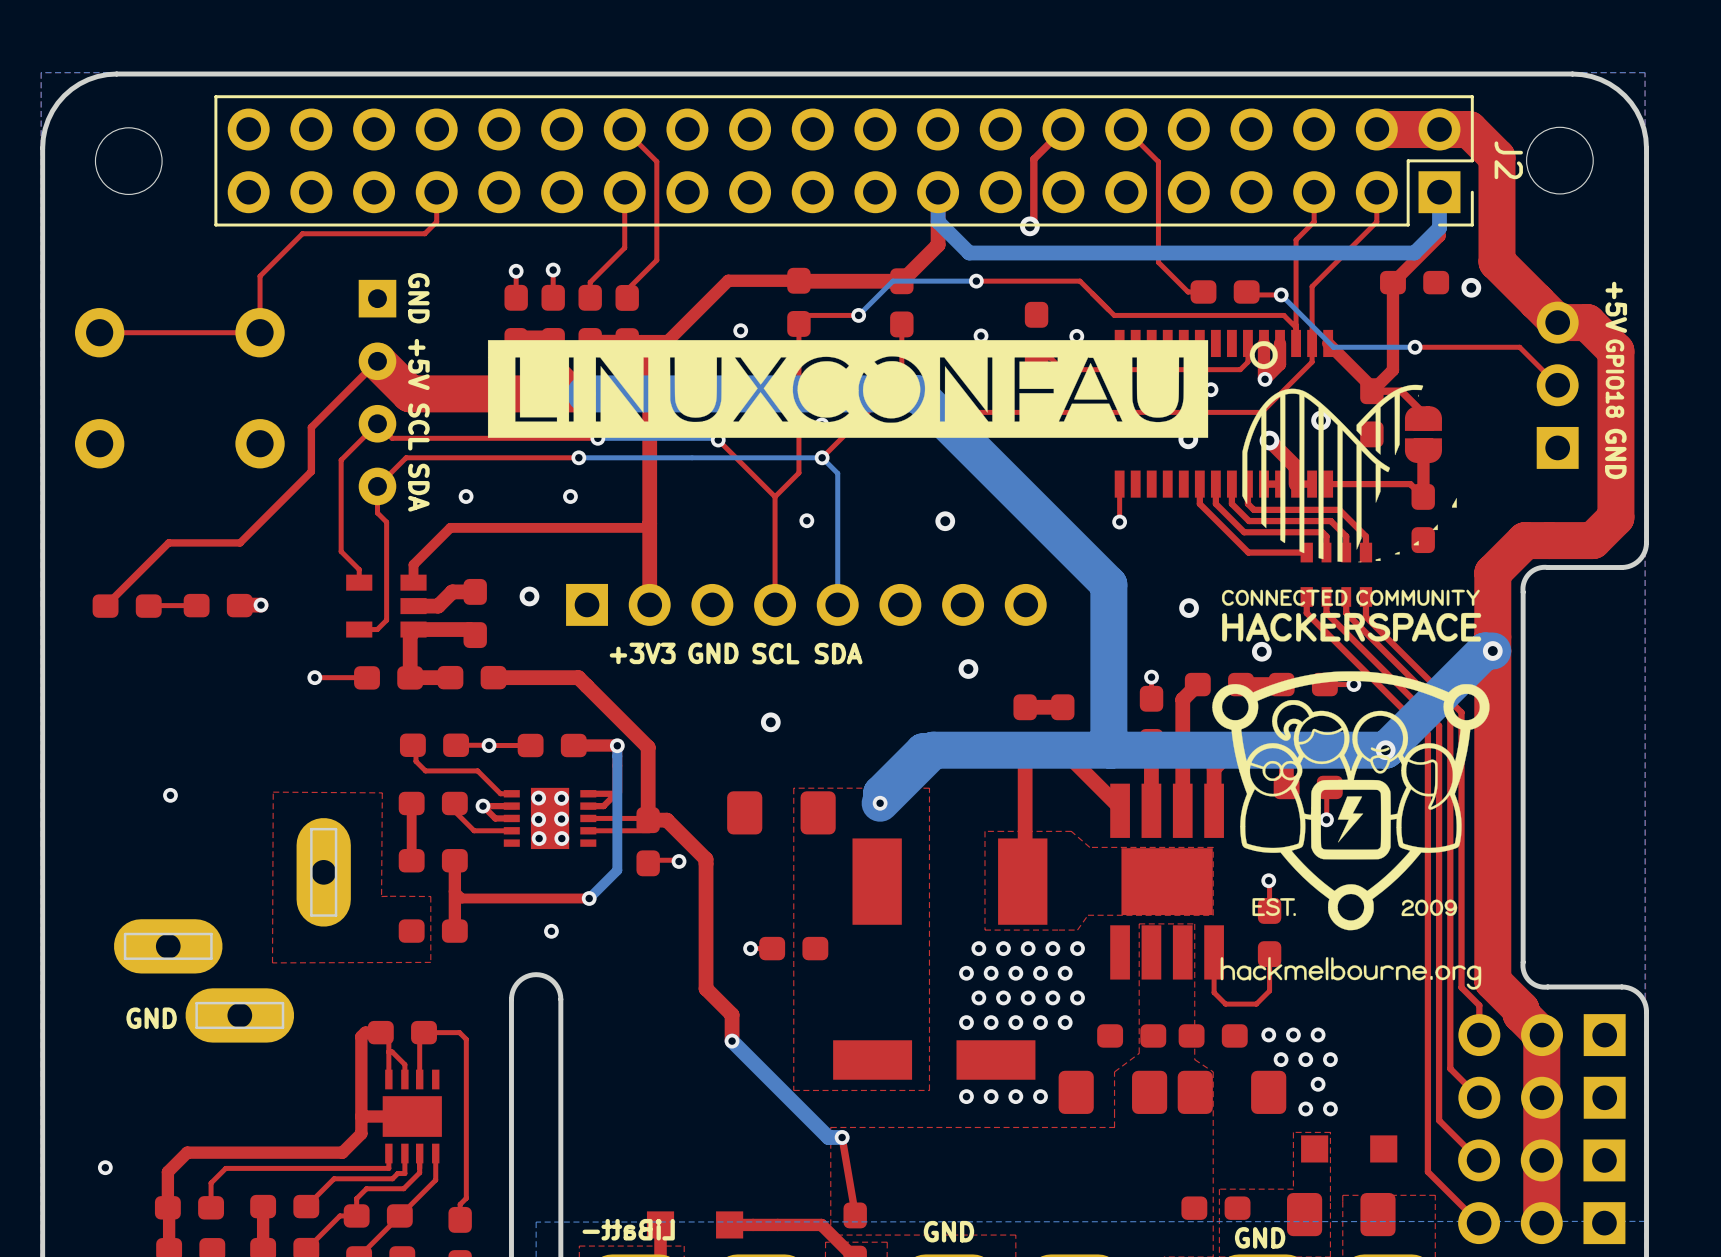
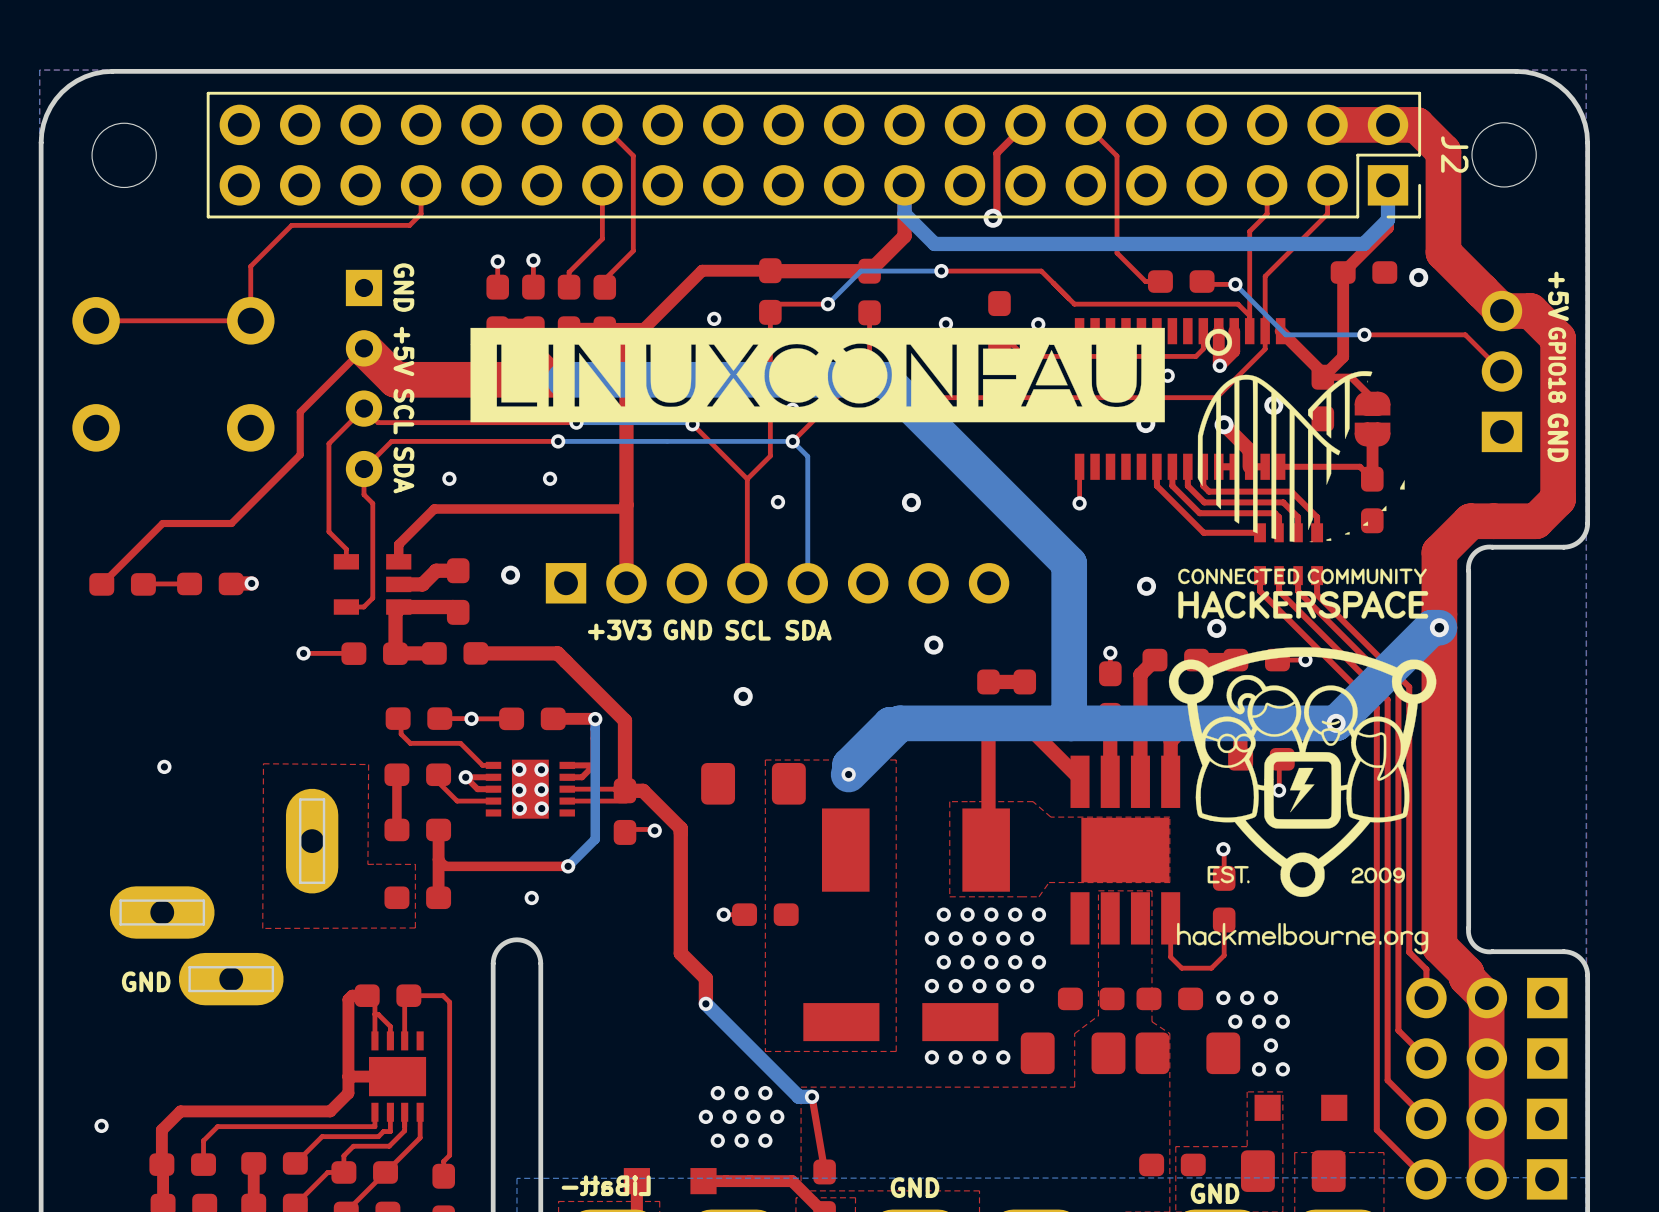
via: none -> (717, 1093)
via: none -> (741, 1093)
via: none -> (765, 1093)
via: none -> (705, 1116)
via: none -> (729, 1116)
via: none -> (753, 1116)
via: none -> (777, 1116)
via: none -> (717, 1140)
via: none -> (741, 1140)
via: none -> (765, 1140)

